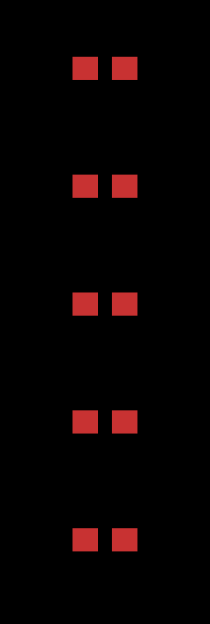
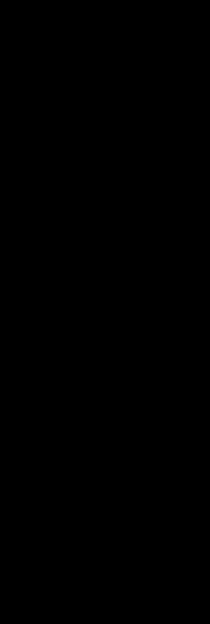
part: (104, 68) -> none
part: (104, 186) -> none
part: (104, 304) -> none
part: (104, 421) -> none
part: (104, 539) -> none

